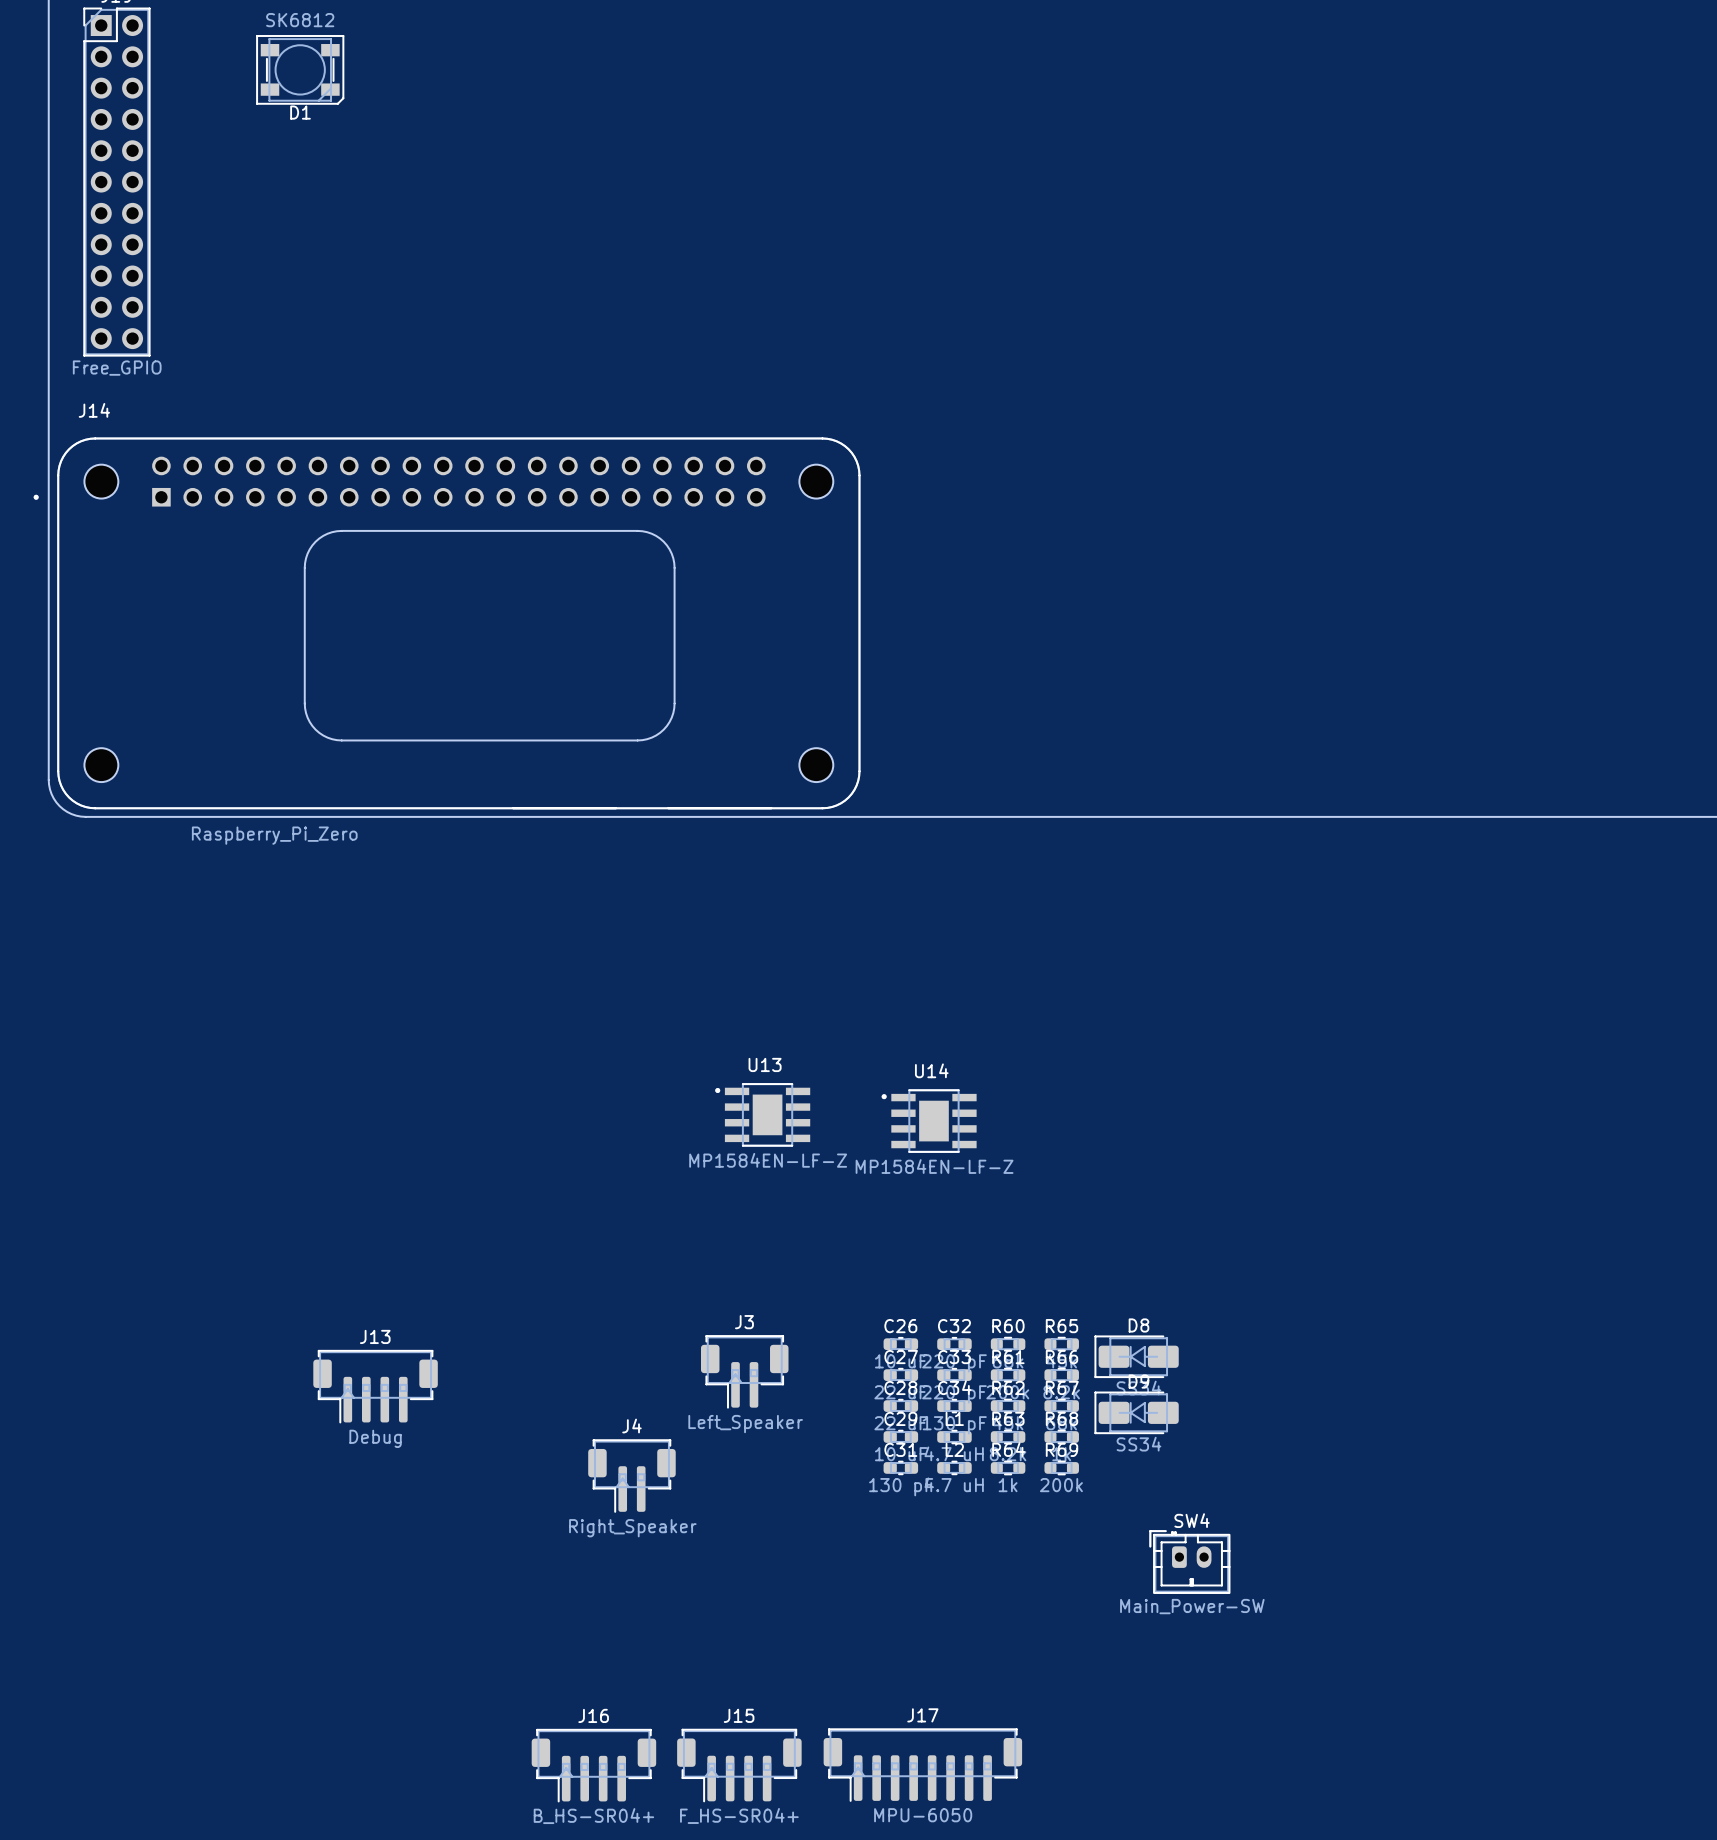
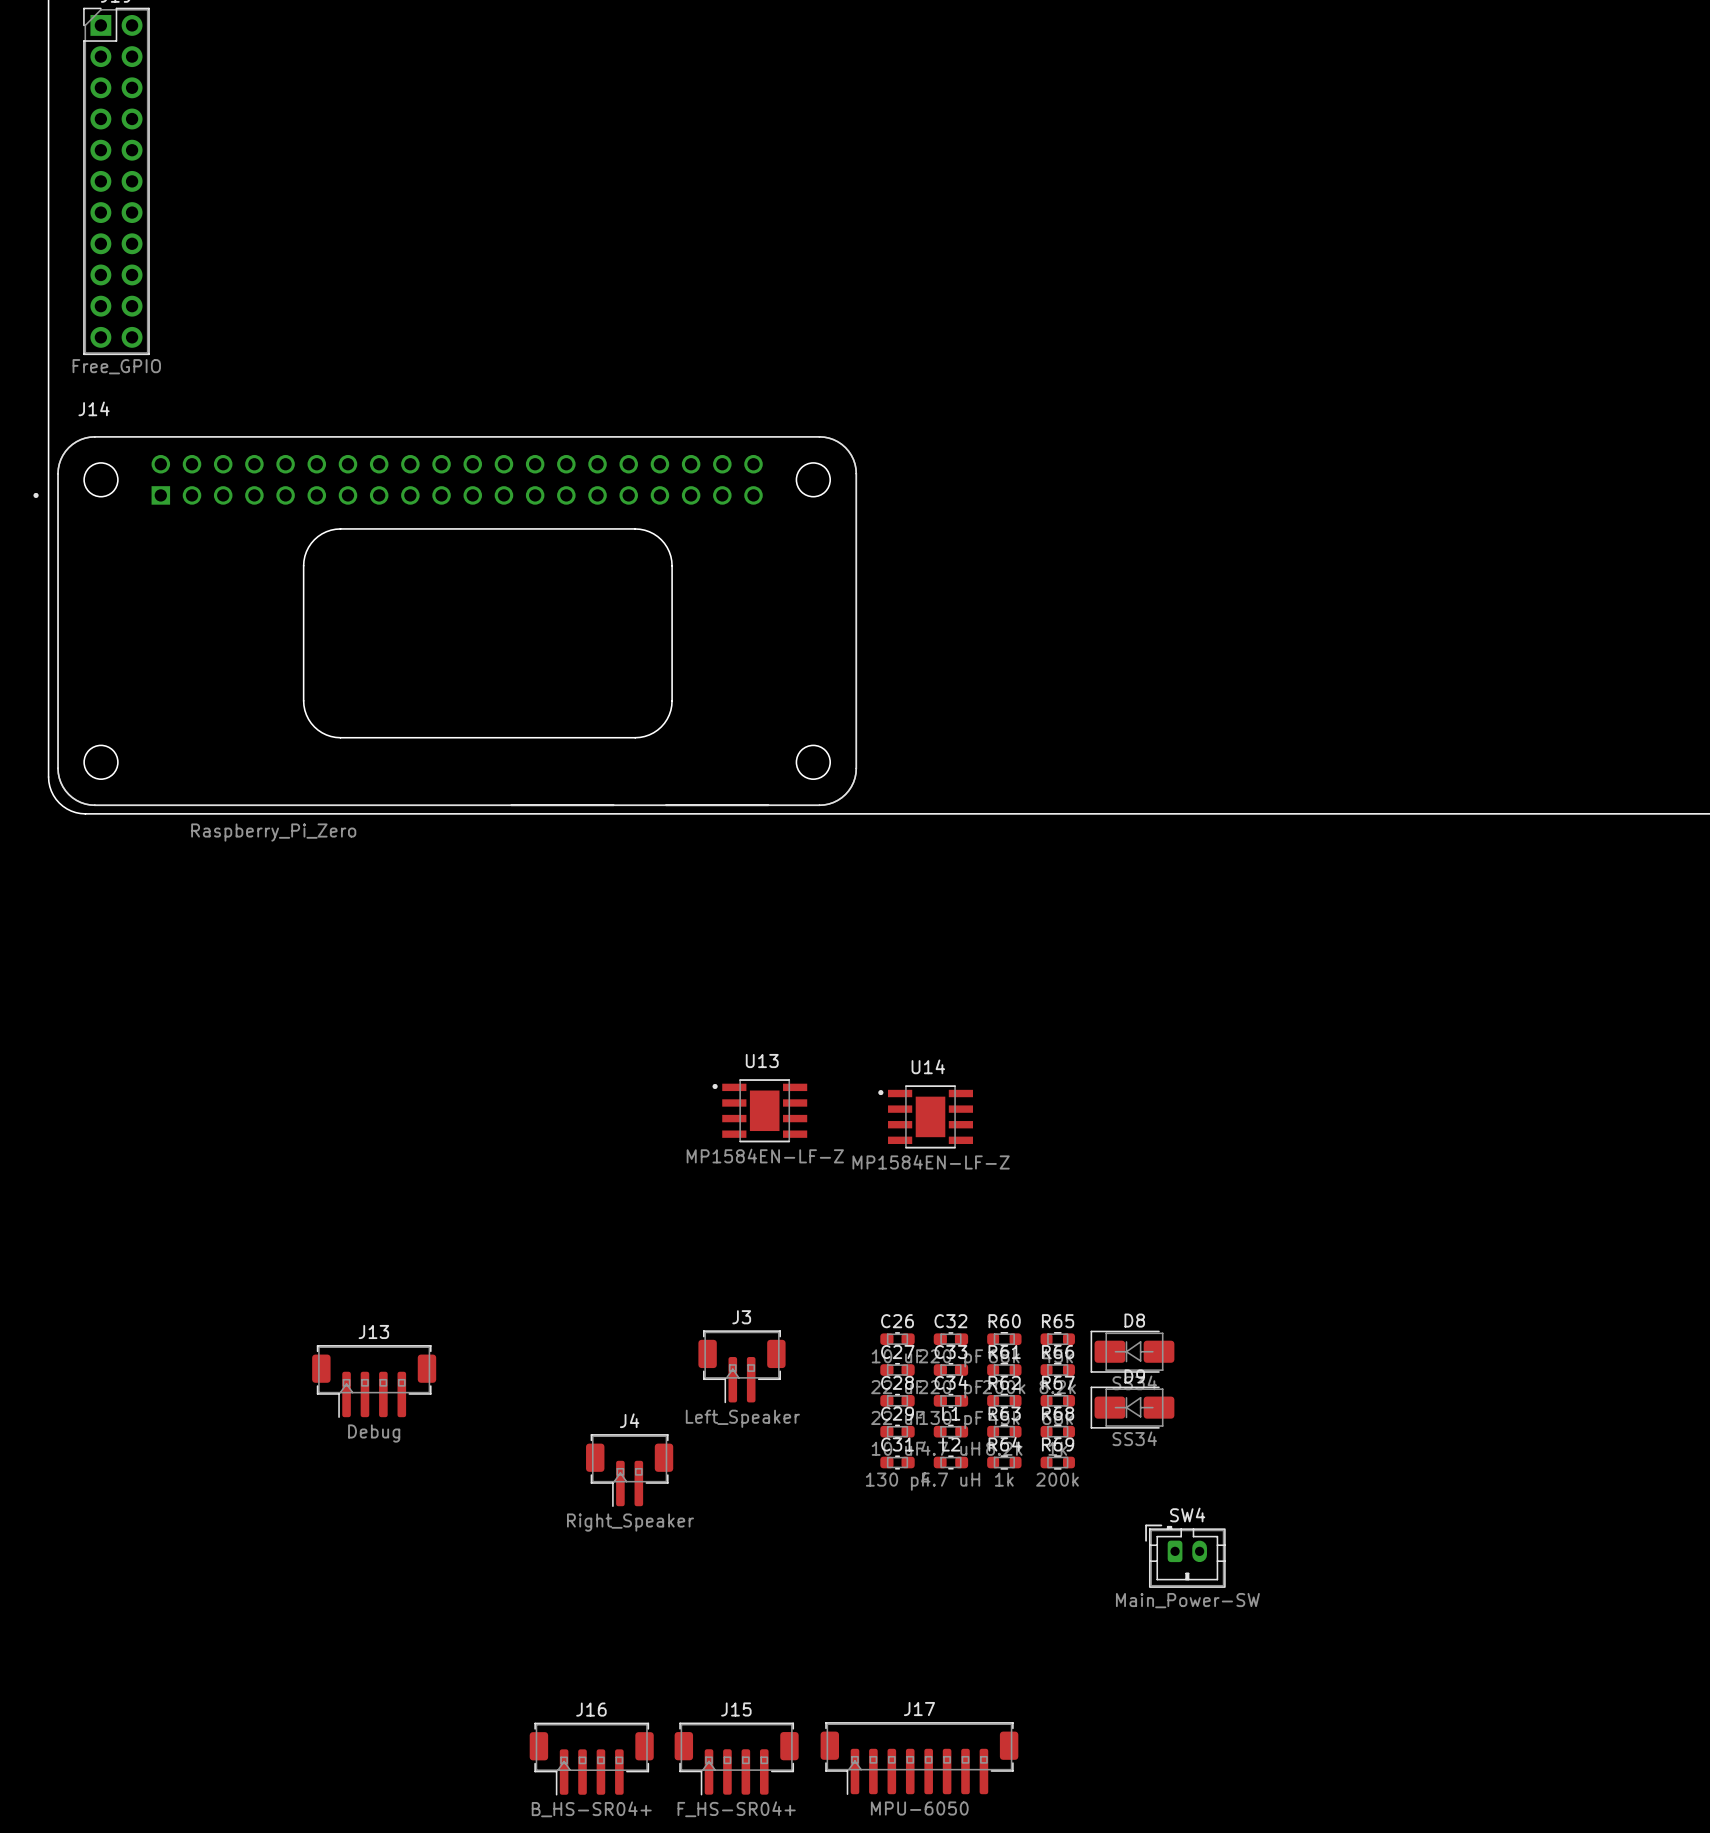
D1: SK6812 (300, 69) -> none

